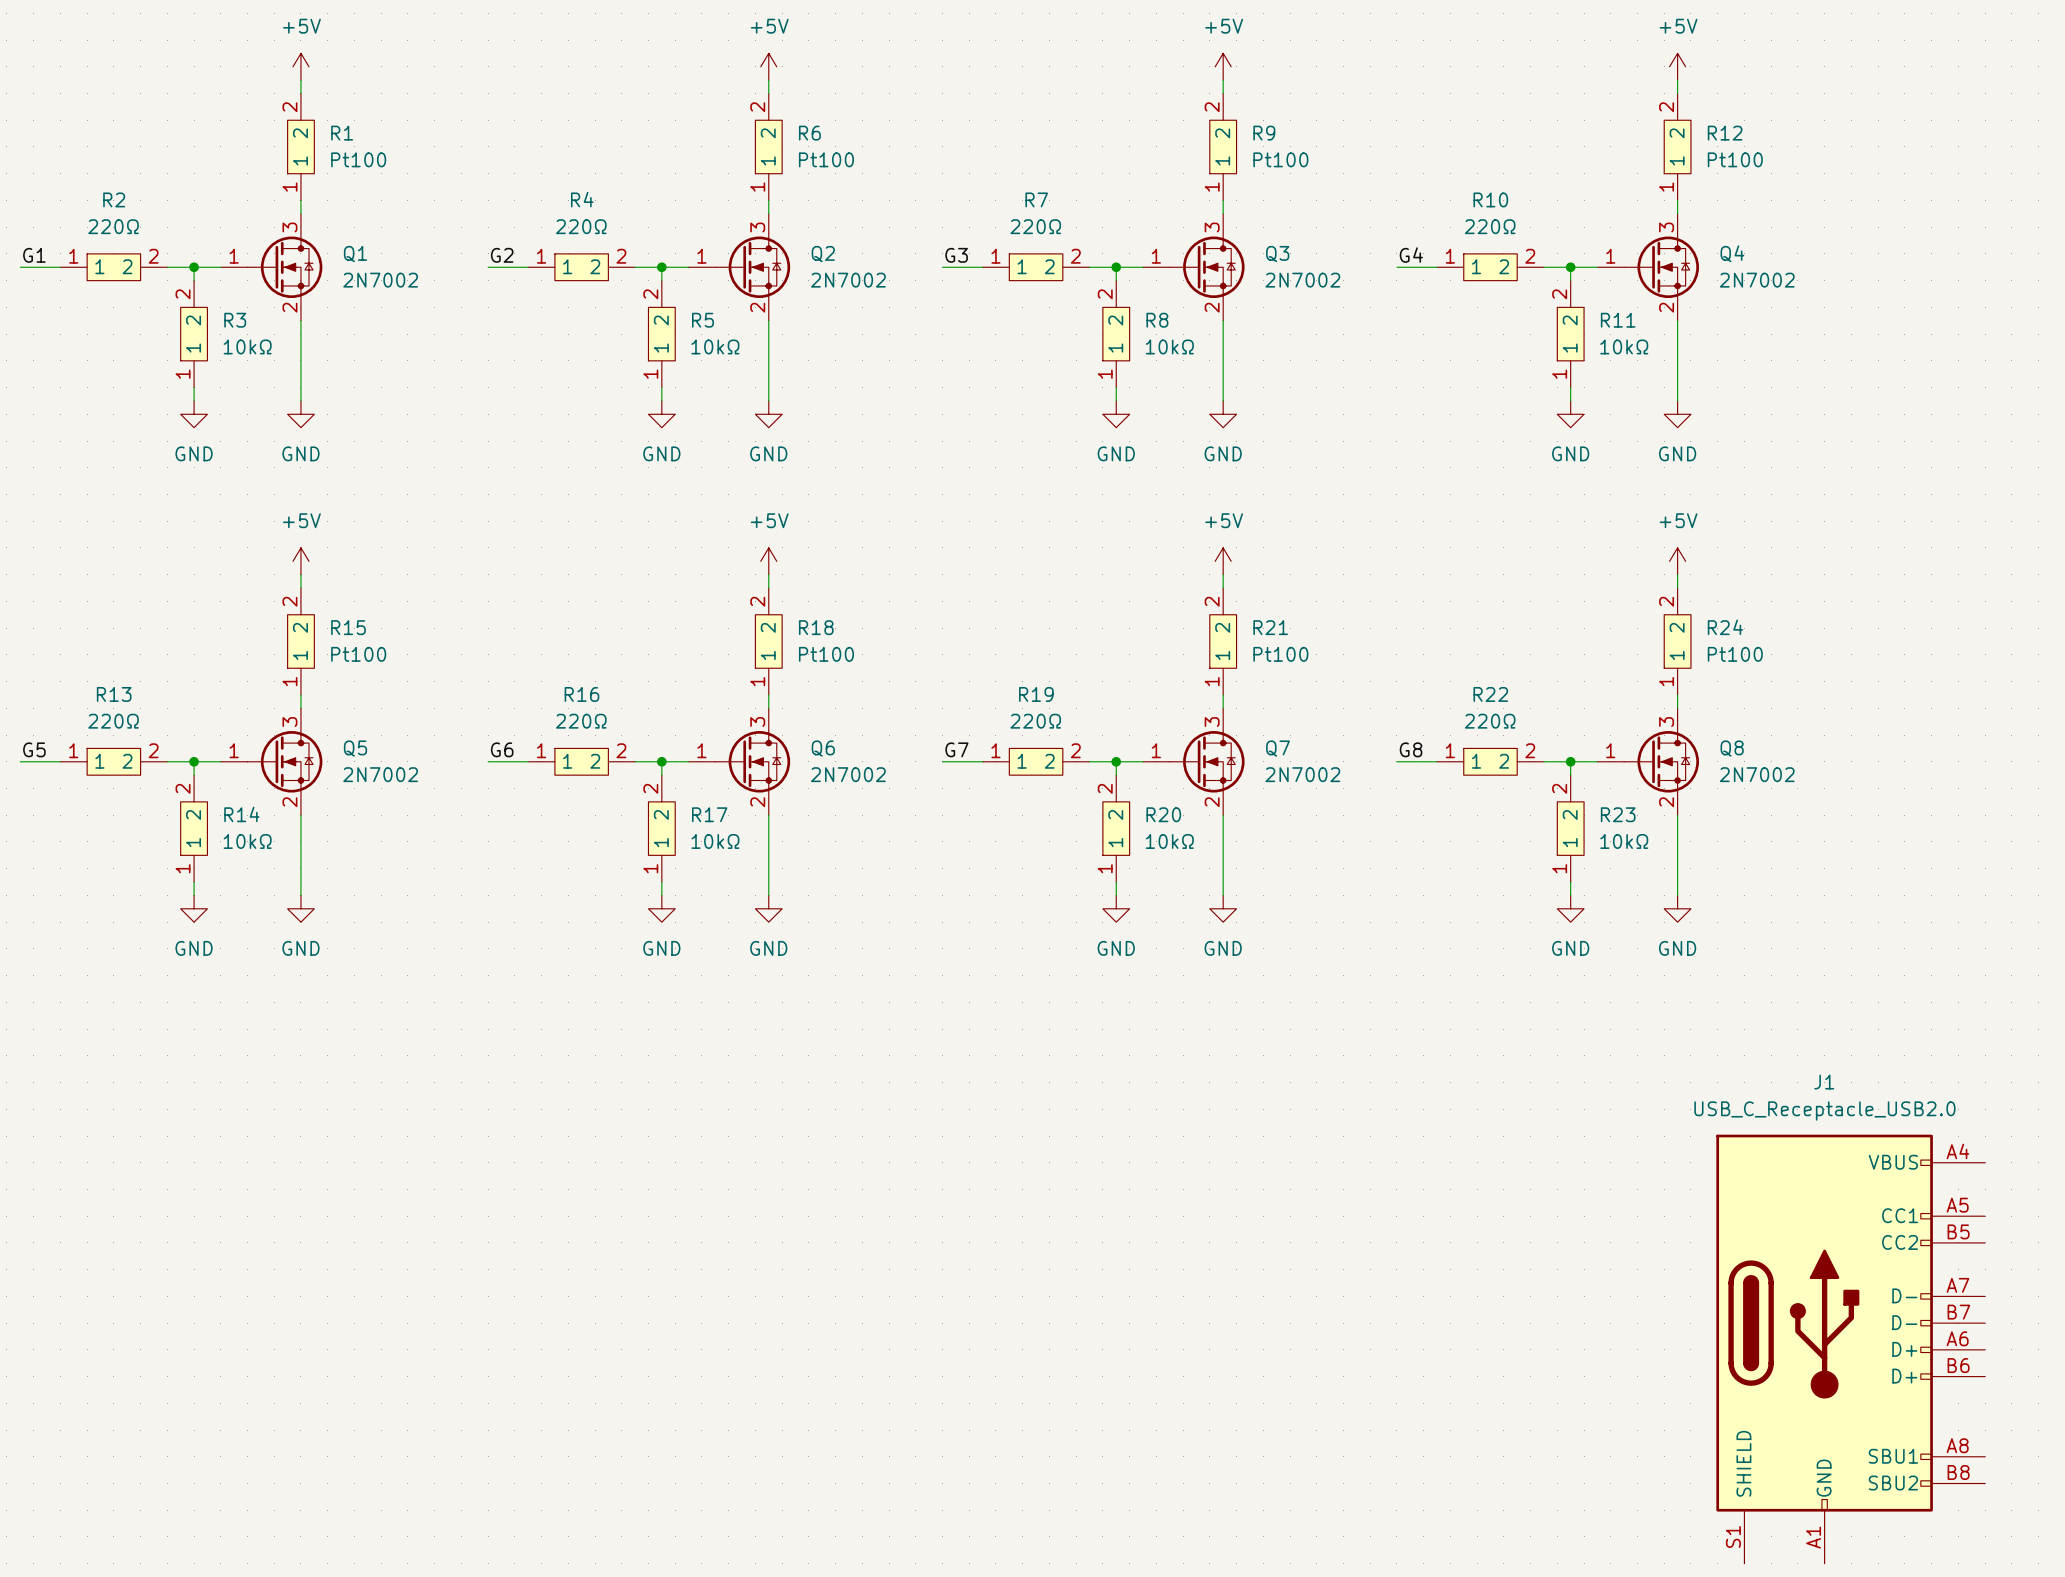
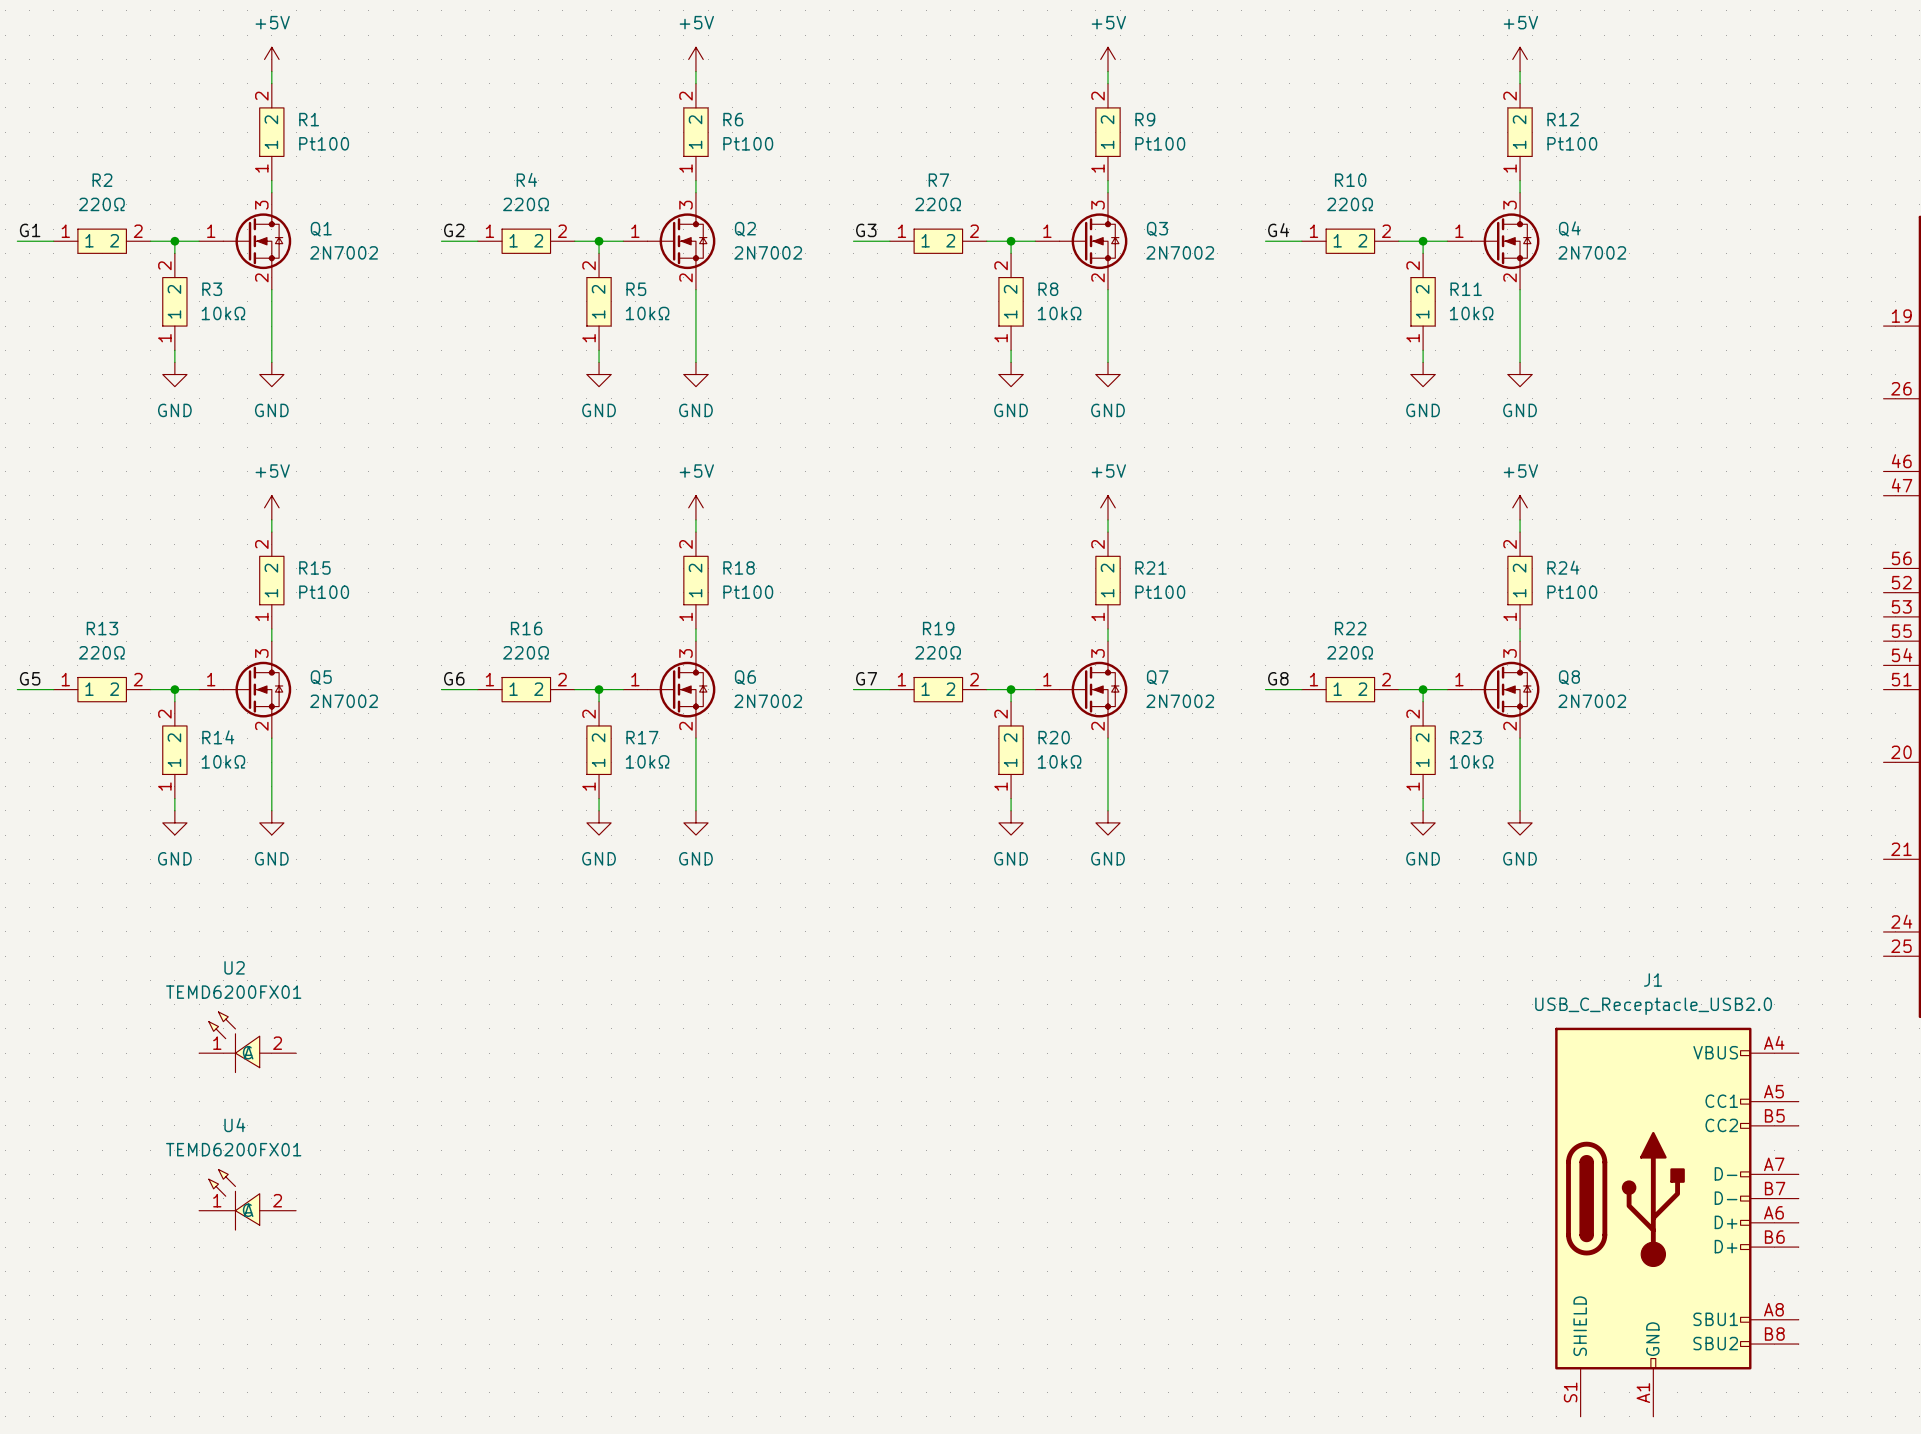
U2: none -> TEMD6200FX01 (247, 1042)
U4: none -> TEMD6200FX01 (247, 1199)

